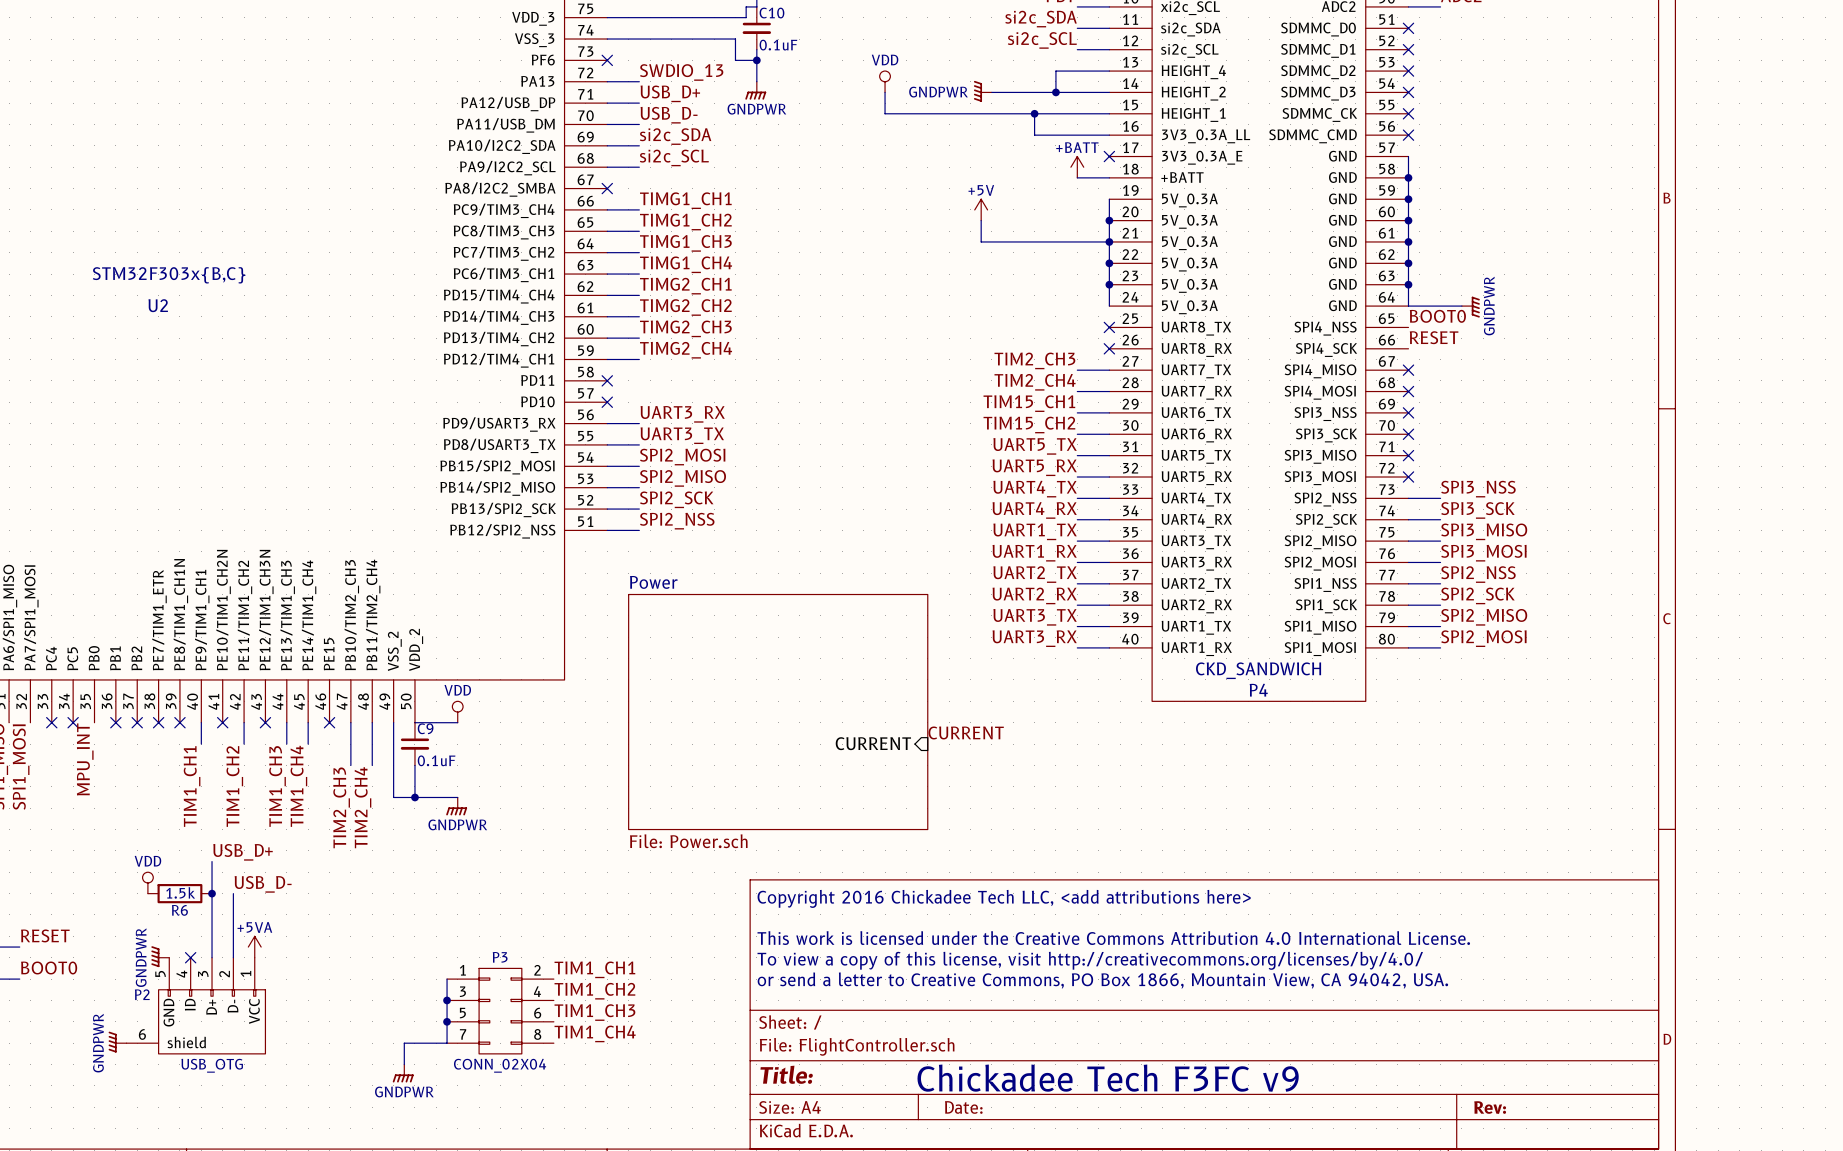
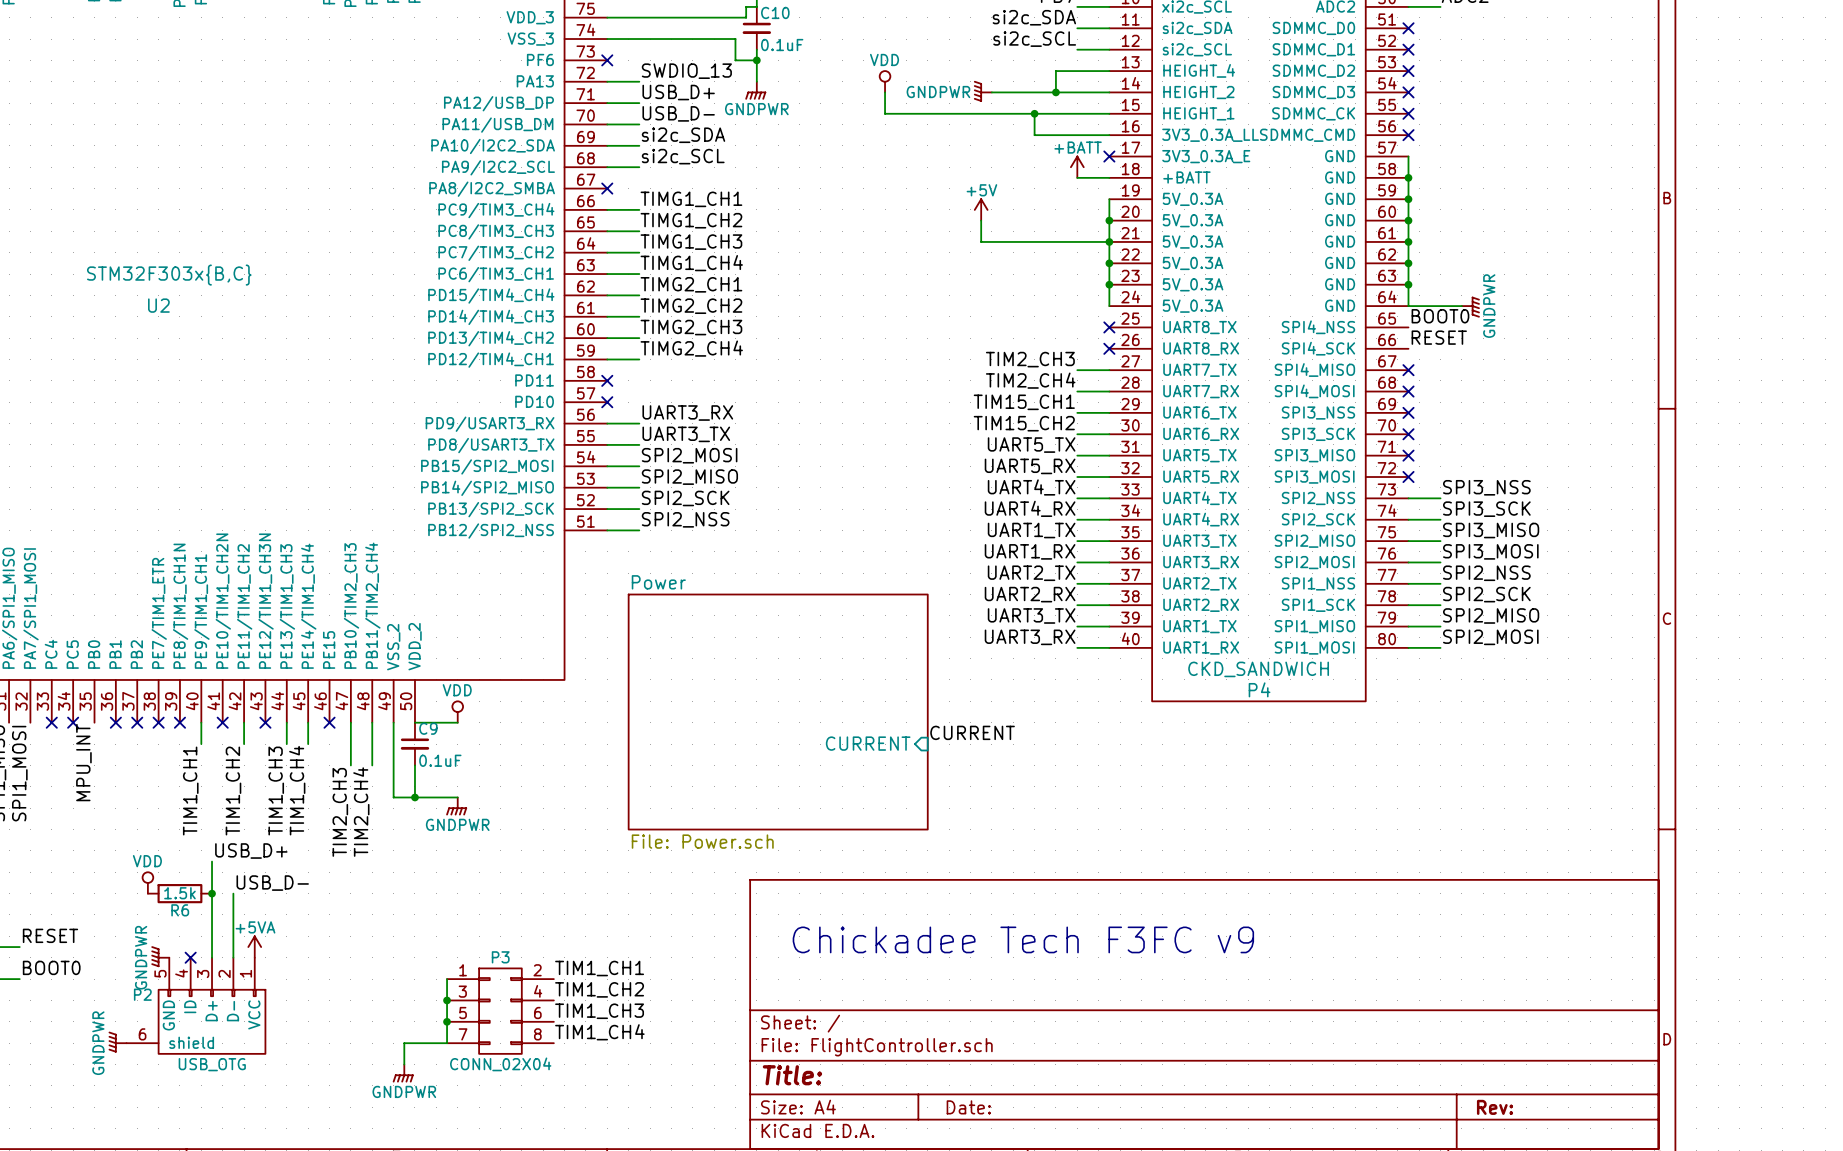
text: Copyright 2016 Chickadee Tech LLC, <add attributions here> (1004, 898) -> none
text: This work is licensed under the Creative Commons Attribution 4.0 International License. (1113, 938) -> none
text: To view a copy of this license, visit http://creativecommons.org/licenses/by/4.0/ (1090, 960) -> none
text: or send a letter to Creative Commons, PO Box 1866, Mountain View, CA 94042, USA. (1102, 980) -> none
text position: Chickadee Tech F3FC v9 (1108, 1078) -> Chickadee Tech F3FC v9 (1023, 939)

